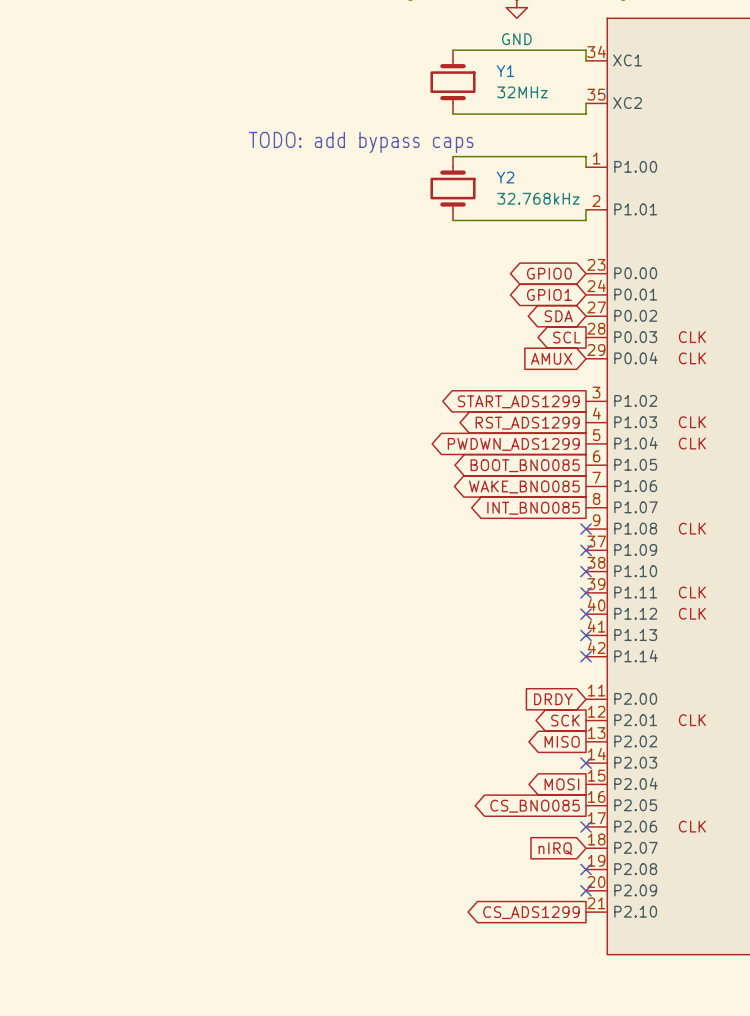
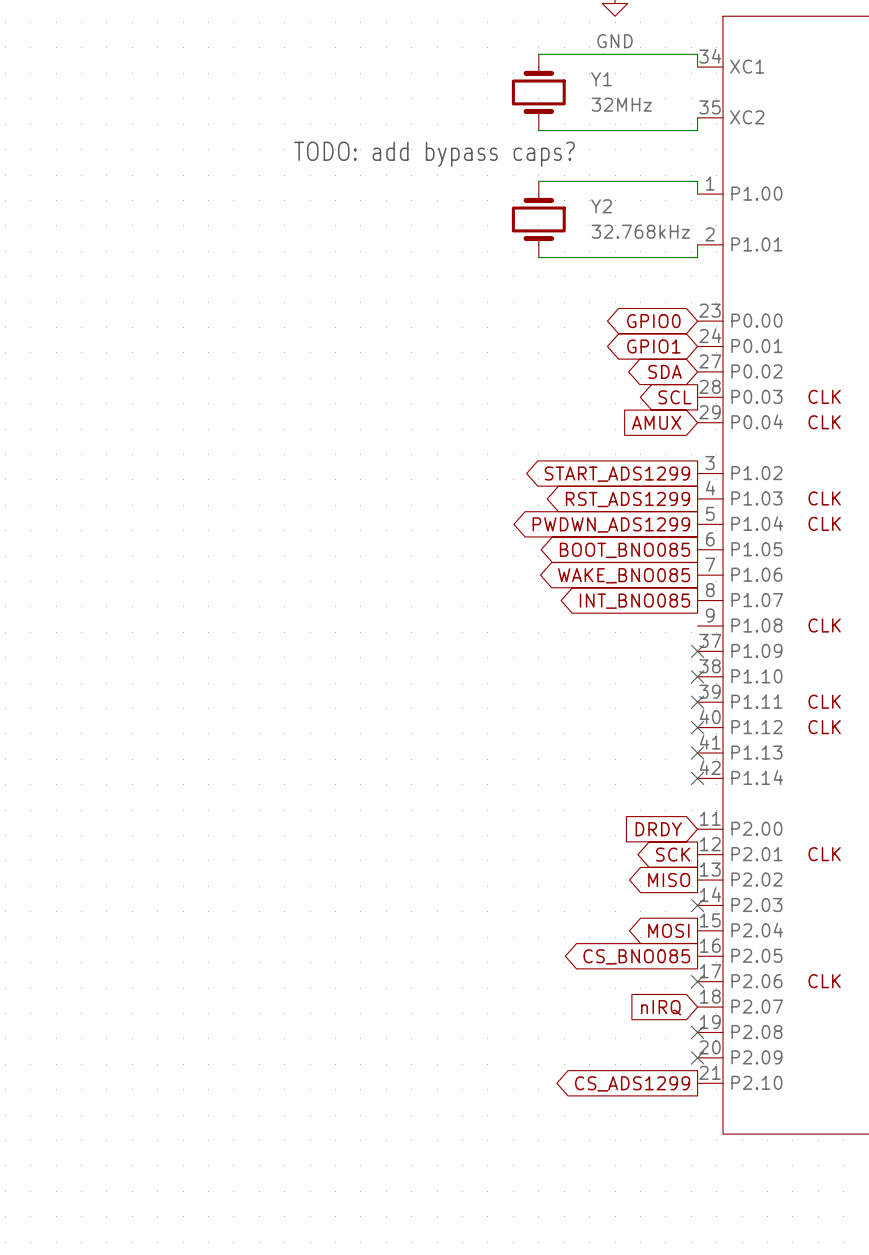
text: TODO: add bypass caps (361, 142) -> TODO: add bypass caps? (434, 154)
no-connect mark: (586, 529) -> none

